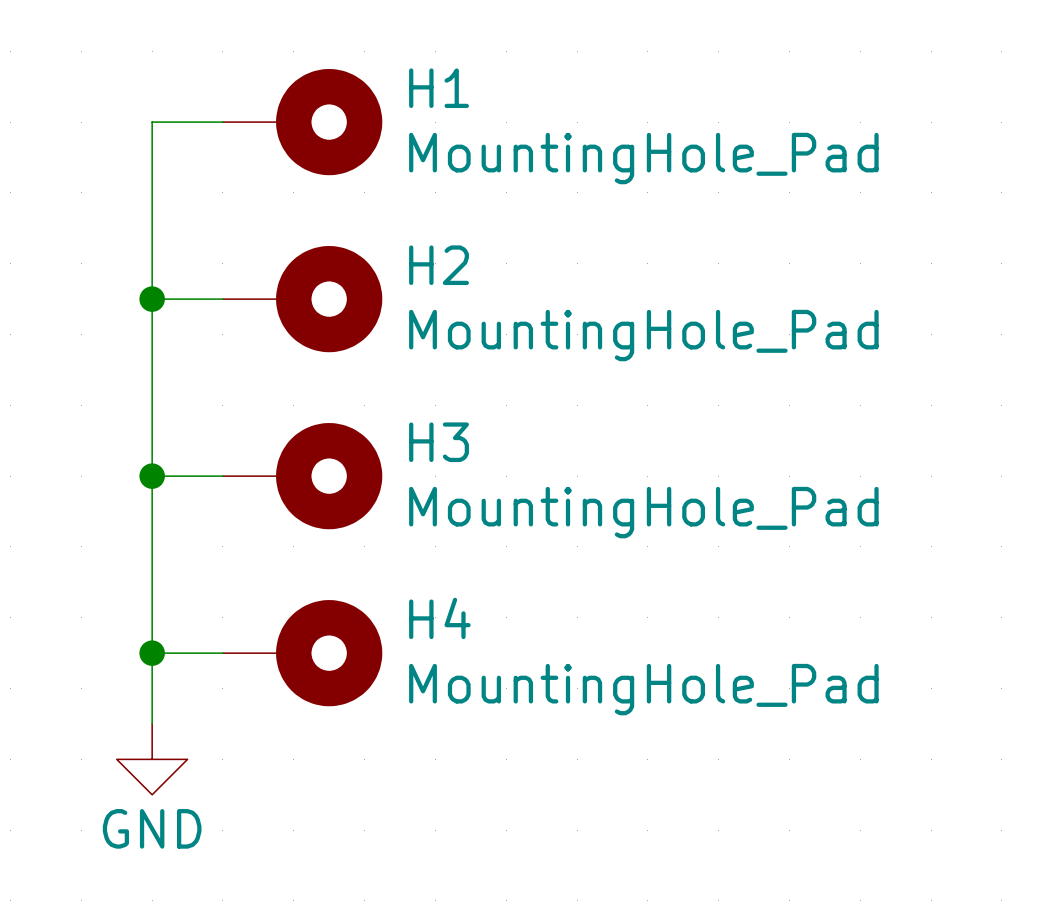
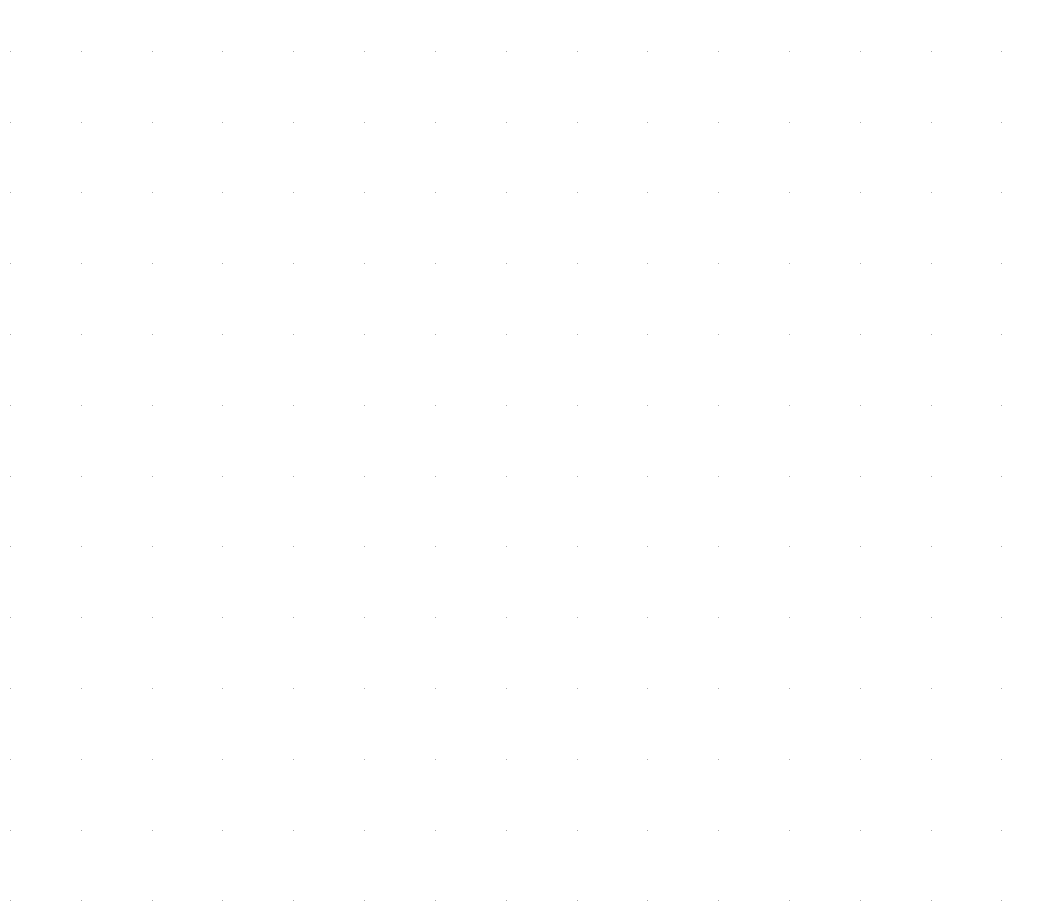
wire: (222, 122) (152, 122) (152, 723) -> none
H1: MountingHole_Pad (302, 122) -> none
wire: (152, 299) (222, 299) -> none
junction: (152, 299) -> none
H2: MountingHole_Pad (302, 299) -> none
wire: (152, 476) (222, 476) -> none
junction: (152, 476) -> none
H3: MountingHole_Pad (302, 476) -> none
wire: (152, 653) (222, 653) -> none
junction: (152, 653) -> none
H4: MountingHole_Pad (302, 653) -> none
power symbol: GND (152, 759) -> none

